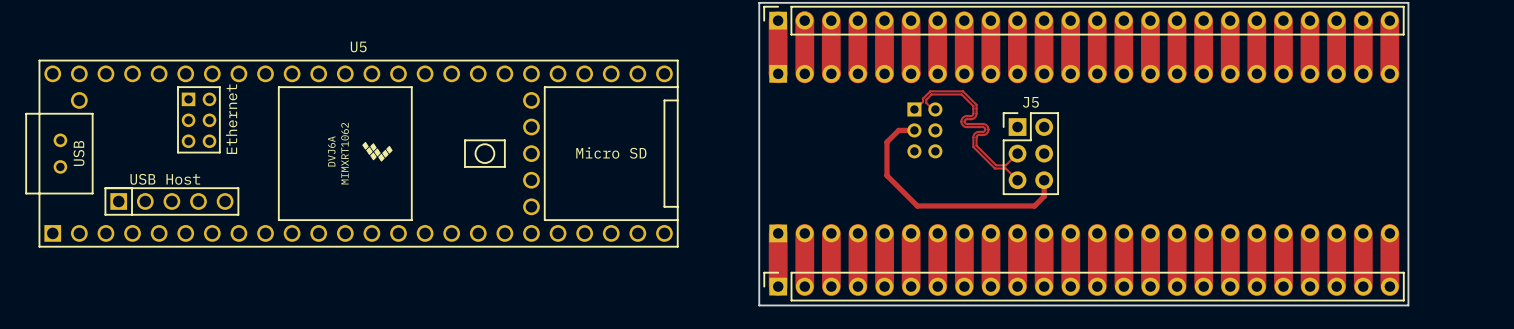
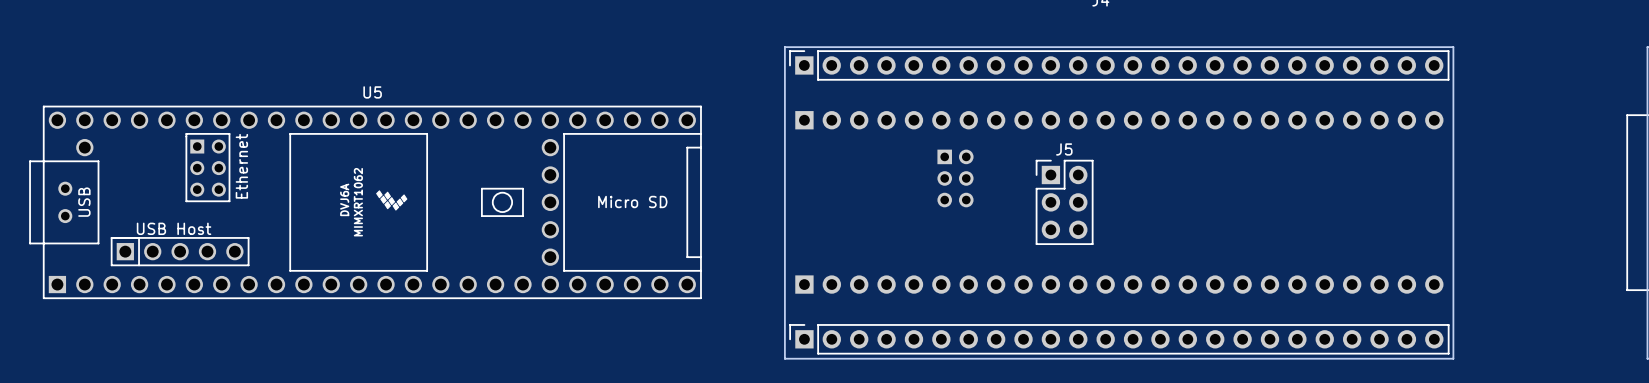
track: (778, 20) (778, 73) -> none
track: (804, 20) (804, 73) -> none
track: (831, 20) (831, 73) -> none
track: (857, 20) (857, 73) -> none
track: (884, 20) (884, 73) -> none
track: (911, 20) (911, 73) -> none
track: (937, 20) (937, 73) -> none
track: (964, 20) (964, 73) -> none
track: (990, 20) (990, 73) -> none
track: (1017, 20) (1017, 73) -> none
track: (1044, 20) (1044, 73) -> none
track: (1070, 20) (1070, 73) -> none
track: (1097, 20) (1097, 73) -> none
track: (1123, 20) (1123, 73) -> none
track: (1150, 20) (1150, 73) -> none
track: (1177, 20) (1177, 73) -> none
track: (1203, 20) (1203, 73) -> none
track: (1230, 20) (1230, 73) -> none
track: (1256, 20) (1256, 73) -> none
track: (1283, 20) (1283, 73) -> none
track: (1310, 20) (1310, 73) -> none
track: (1336, 20) (1336, 73) -> none
track: (1363, 20) (1363, 73) -> none
track: (1389, 20) (1389, 73) -> none
track: (914, 109) (930, 91) (963, 91) (976, 104) (975, 116) (965, 119) (965, 123) (984, 124) (988, 128) (985, 134) (977, 135) (976, 145) (996, 165) (1005, 165) (1017, 153) -> none
track: (935, 109) (926, 102) (926, 99) (931, 94) (961, 94) (973, 106) (973, 114) (963, 117) (962, 124) (965, 126) (983, 127) (985, 128) (984, 131) (974, 134) (973, 146) (994, 168) (1005, 168) (1017, 180) -> none
track: (914, 130) (898, 130) (886, 142) (886, 175) (917, 205) (1034, 205) (1044, 196) (1044, 180) -> none
track: (778, 233) (778, 286) -> none
track: (804, 233) (804, 286) -> none
track: (831, 233) (831, 286) -> none
track: (857, 233) (857, 286) -> none
track: (884, 233) (884, 286) -> none
track: (911, 233) (911, 286) -> none
track: (937, 233) (937, 286) -> none
track: (964, 233) (964, 286) -> none
track: (990, 233) (990, 286) -> none
track: (1017, 233) (1017, 286) -> none
track: (1044, 233) (1044, 286) -> none
track: (1070, 233) (1070, 286) -> none
track: (1097, 233) (1097, 286) -> none
track: (1123, 233) (1123, 286) -> none
track: (1150, 233) (1150, 286) -> none
track: (1177, 233) (1177, 286) -> none
track: (1203, 233) (1203, 286) -> none
track: (1230, 233) (1230, 286) -> none
track: (1256, 233) (1256, 286) -> none
track: (1283, 233) (1283, 286) -> none
track: (1310, 233) (1310, 286) -> none
track: (1336, 233) (1336, 286) -> none
track: (1363, 233) (1363, 286) -> none
track: (1389, 233) (1389, 286) -> none

